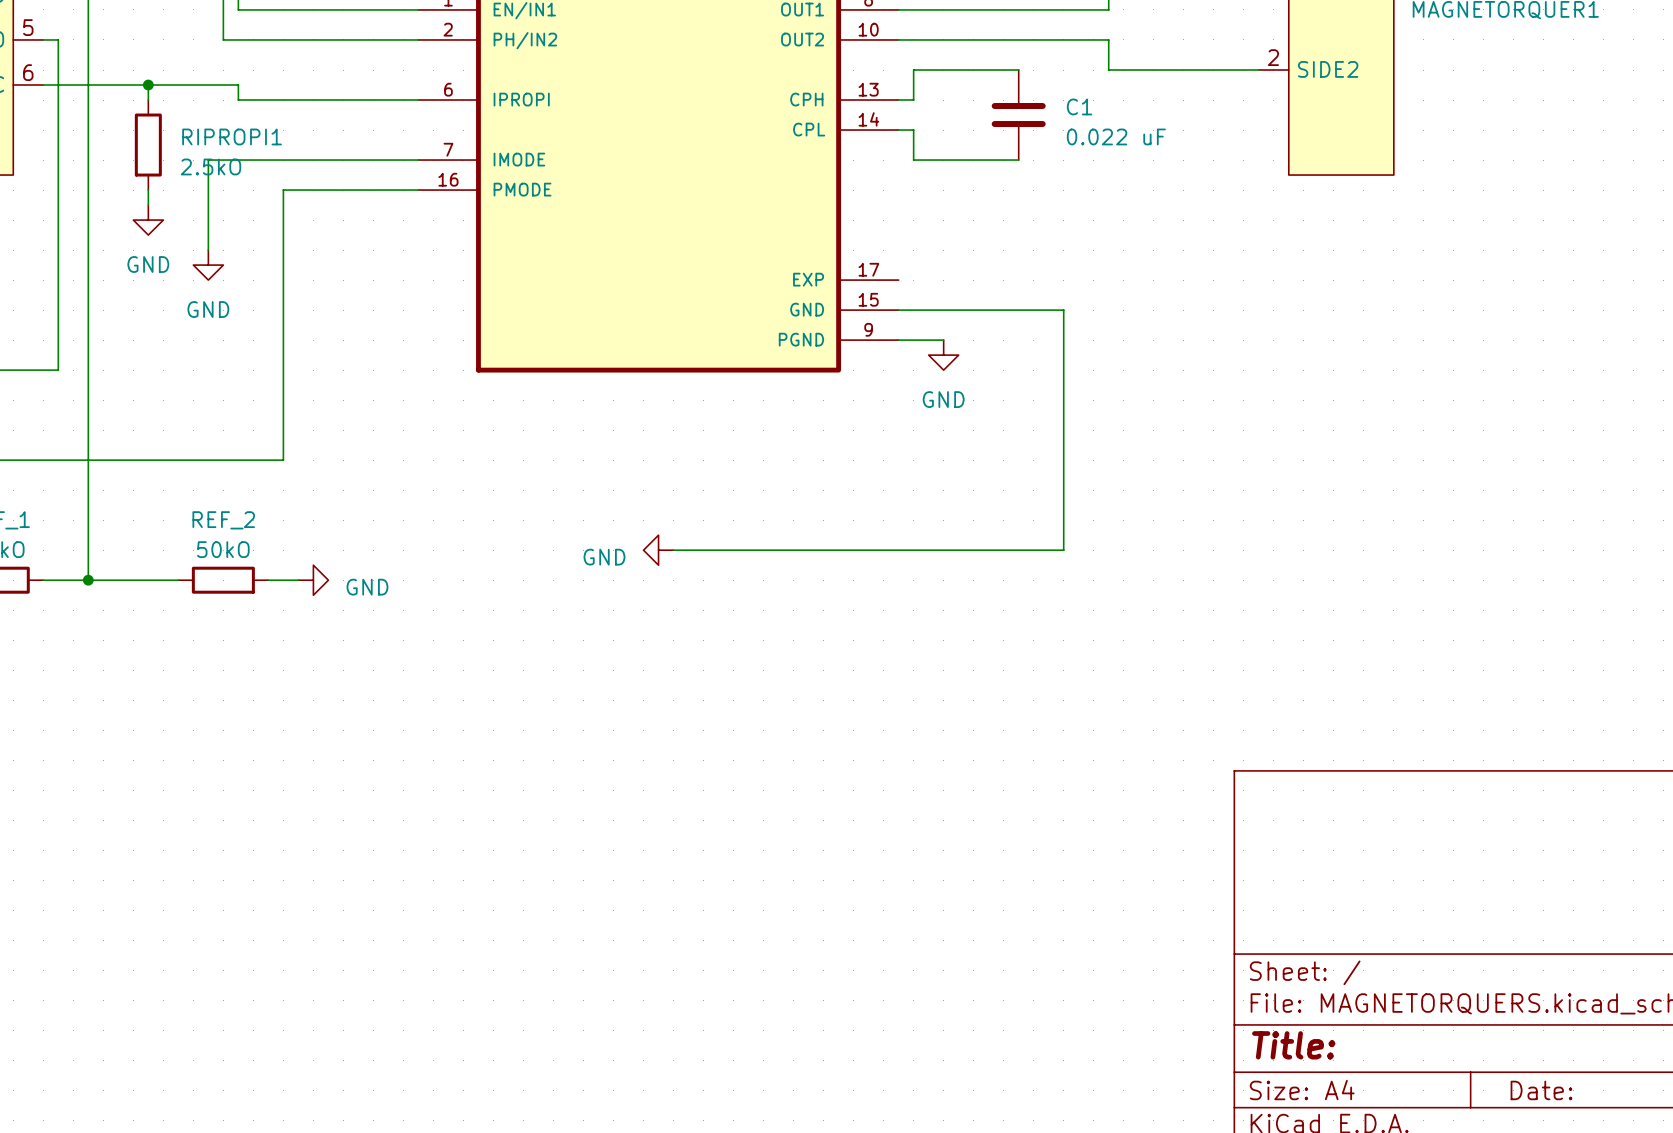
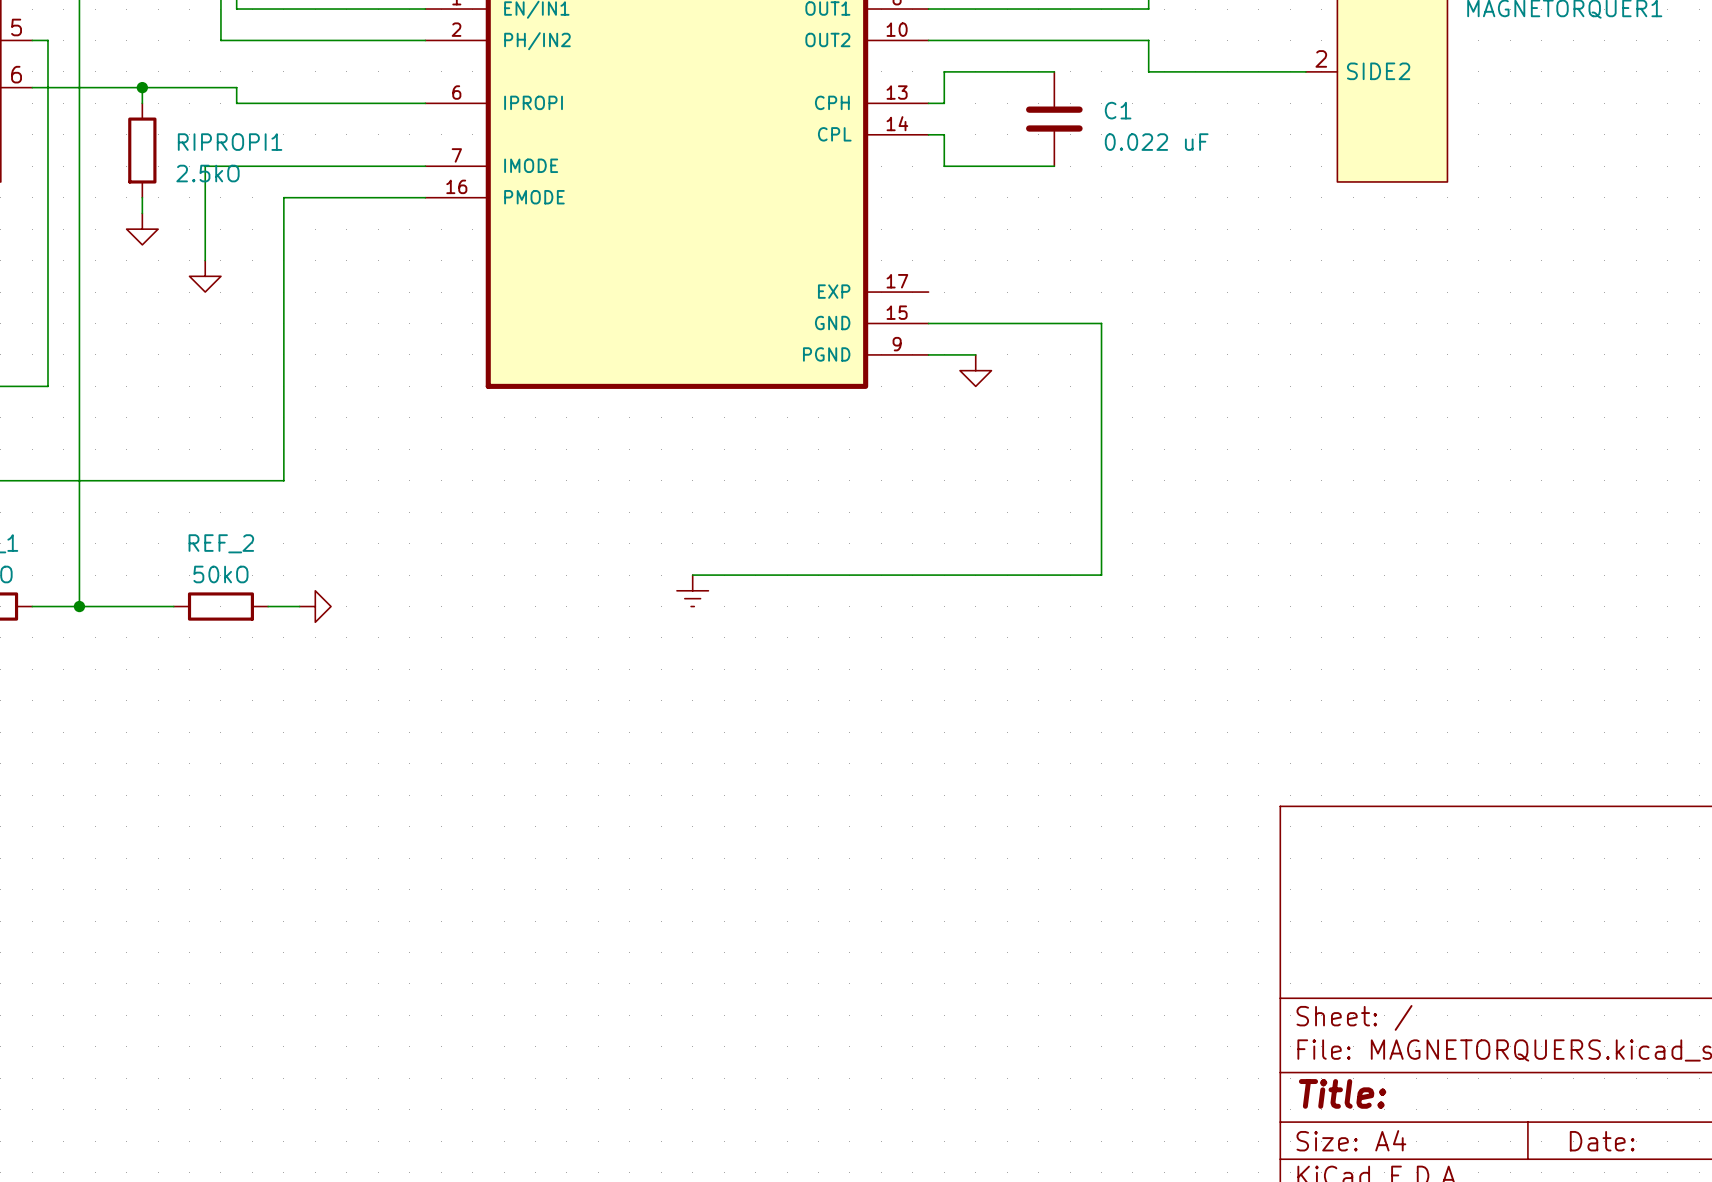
power symbol text: GND (148, 264) -> none
power symbol text: GND (208, 309) -> none
power symbol text: GND (943, 399) -> none
power symbol: GND (658, 550) -> none
power symbol: none -> (692, 590)
power symbol text: GND (367, 587) -> none

